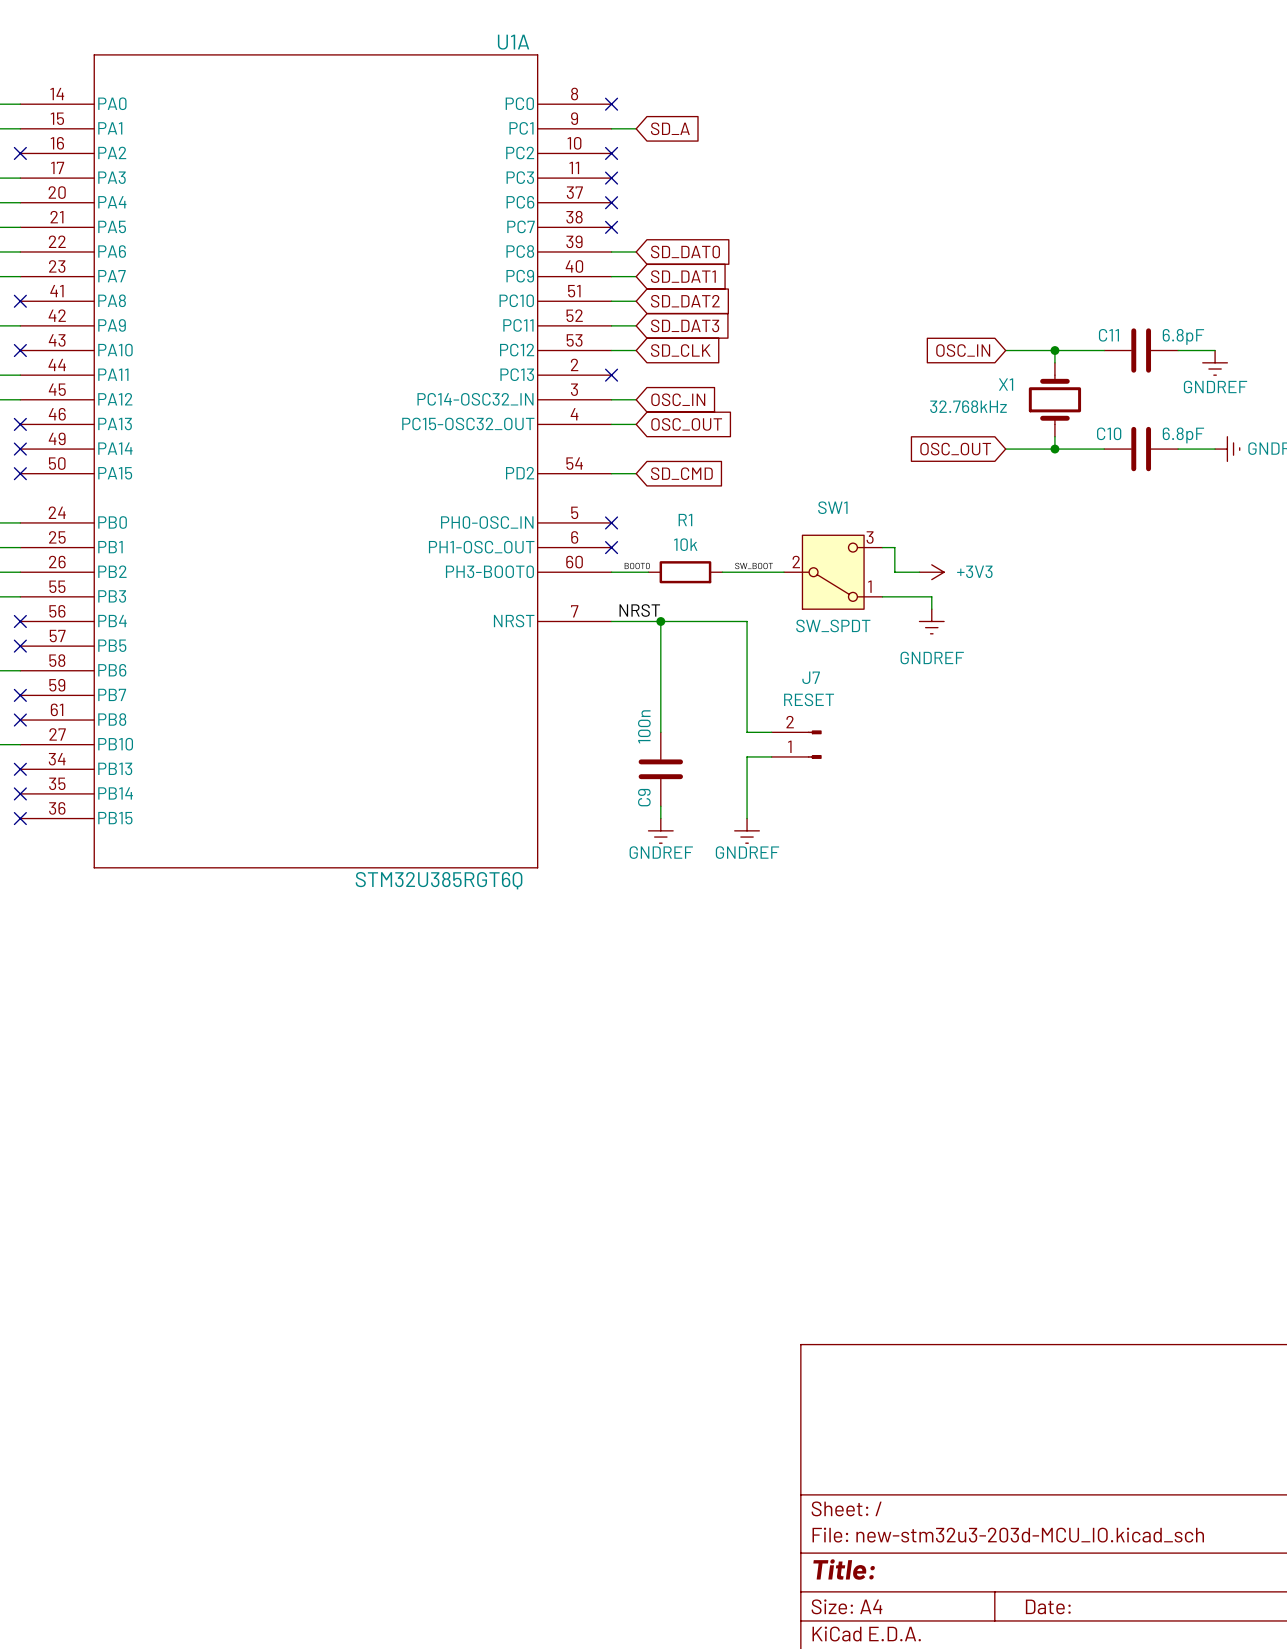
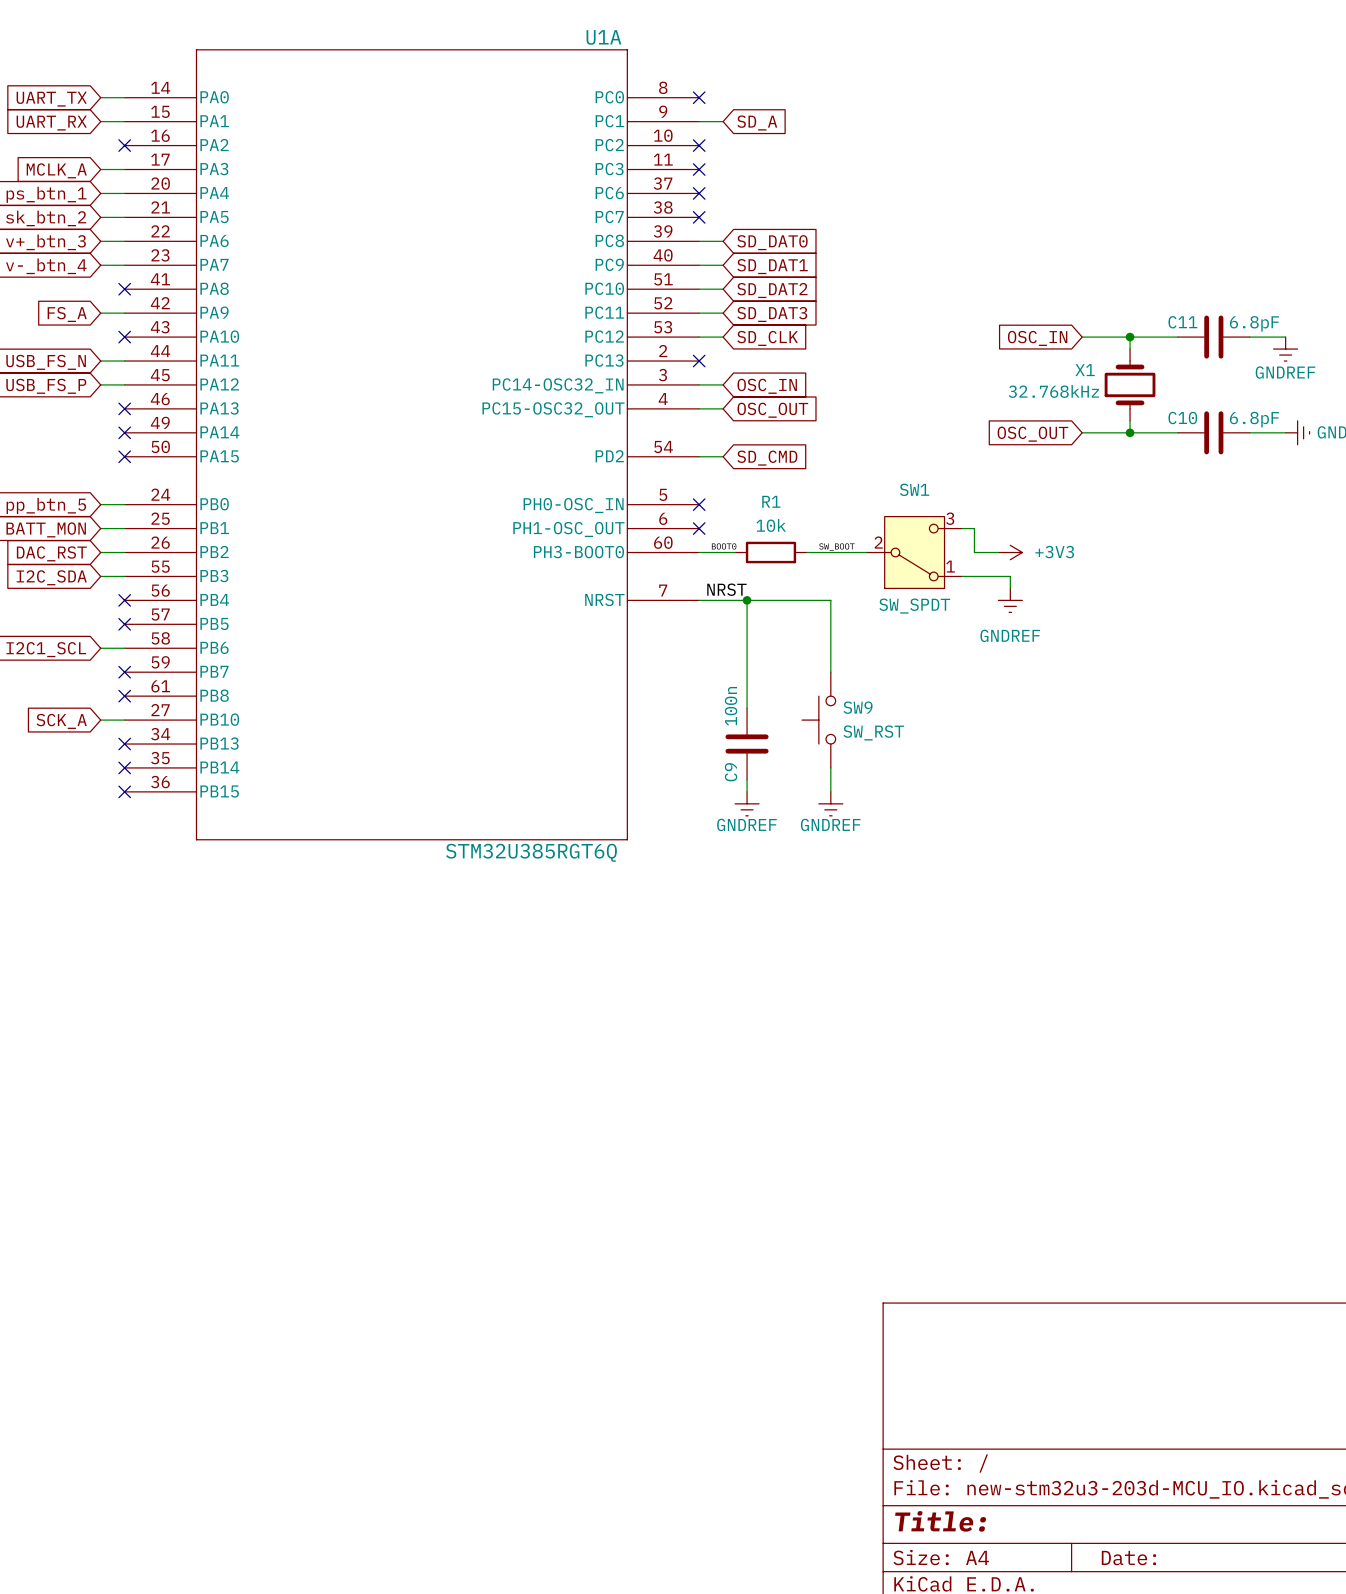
wire: (747, 695) (747, 732) (771, 732) -> none
SW9: none -> SW_RST (818, 720)
J7: RESET (796, 744) -> none
wire: (771, 756) (747, 756) (747, 793) -> none

